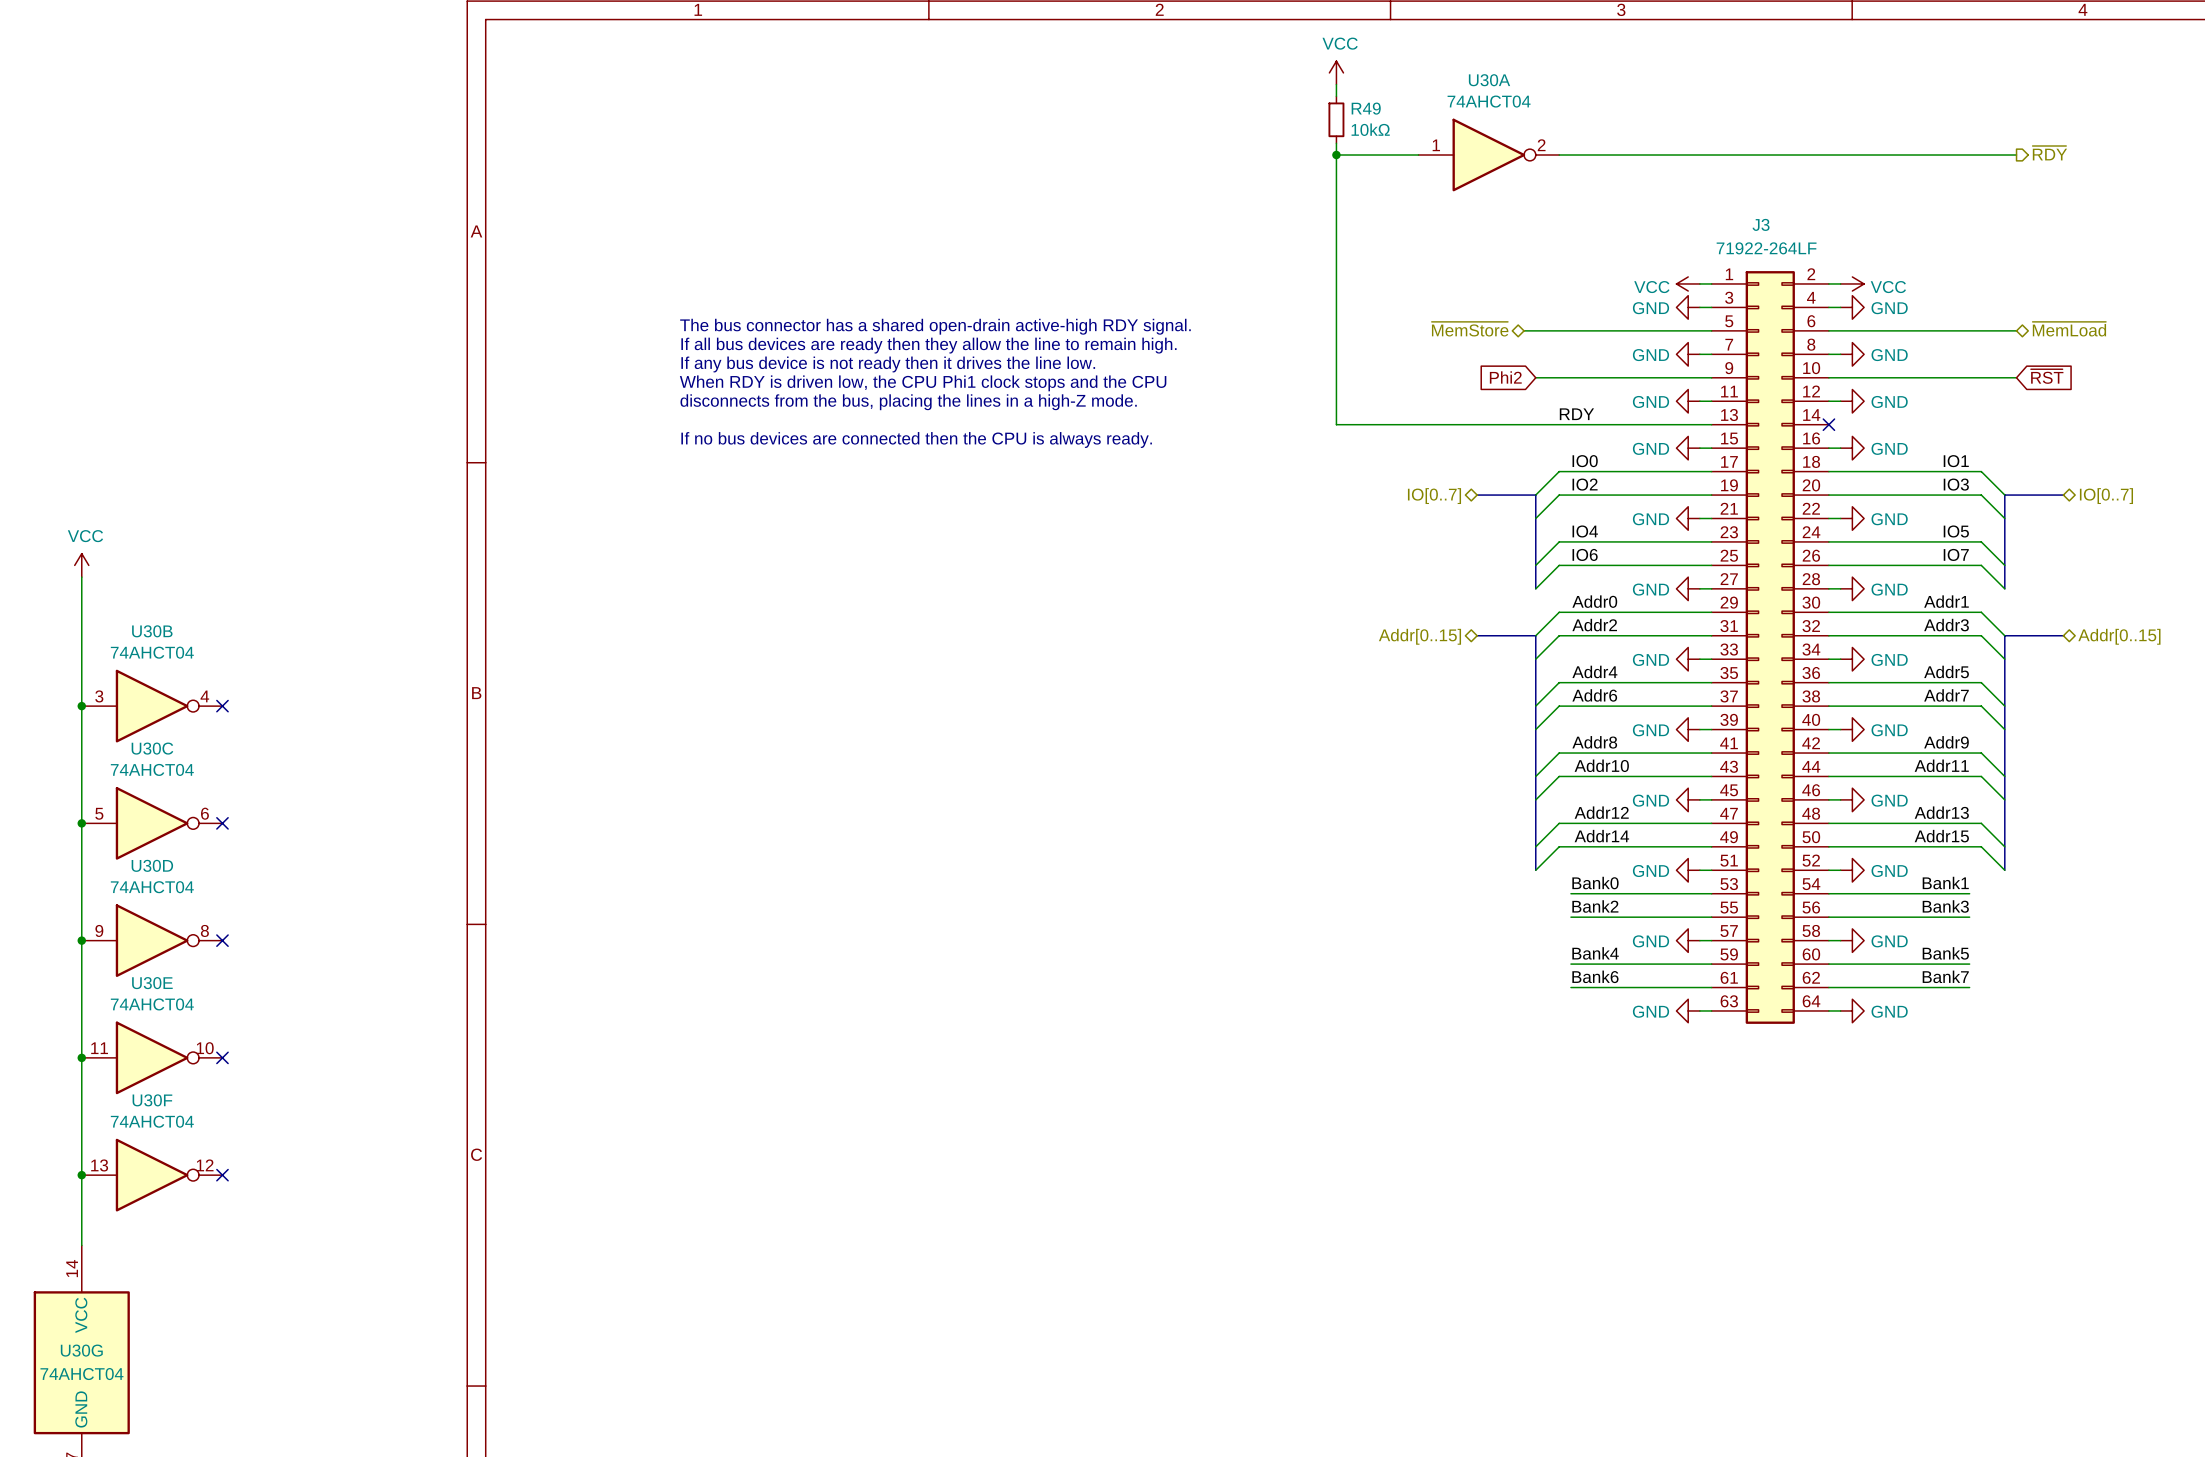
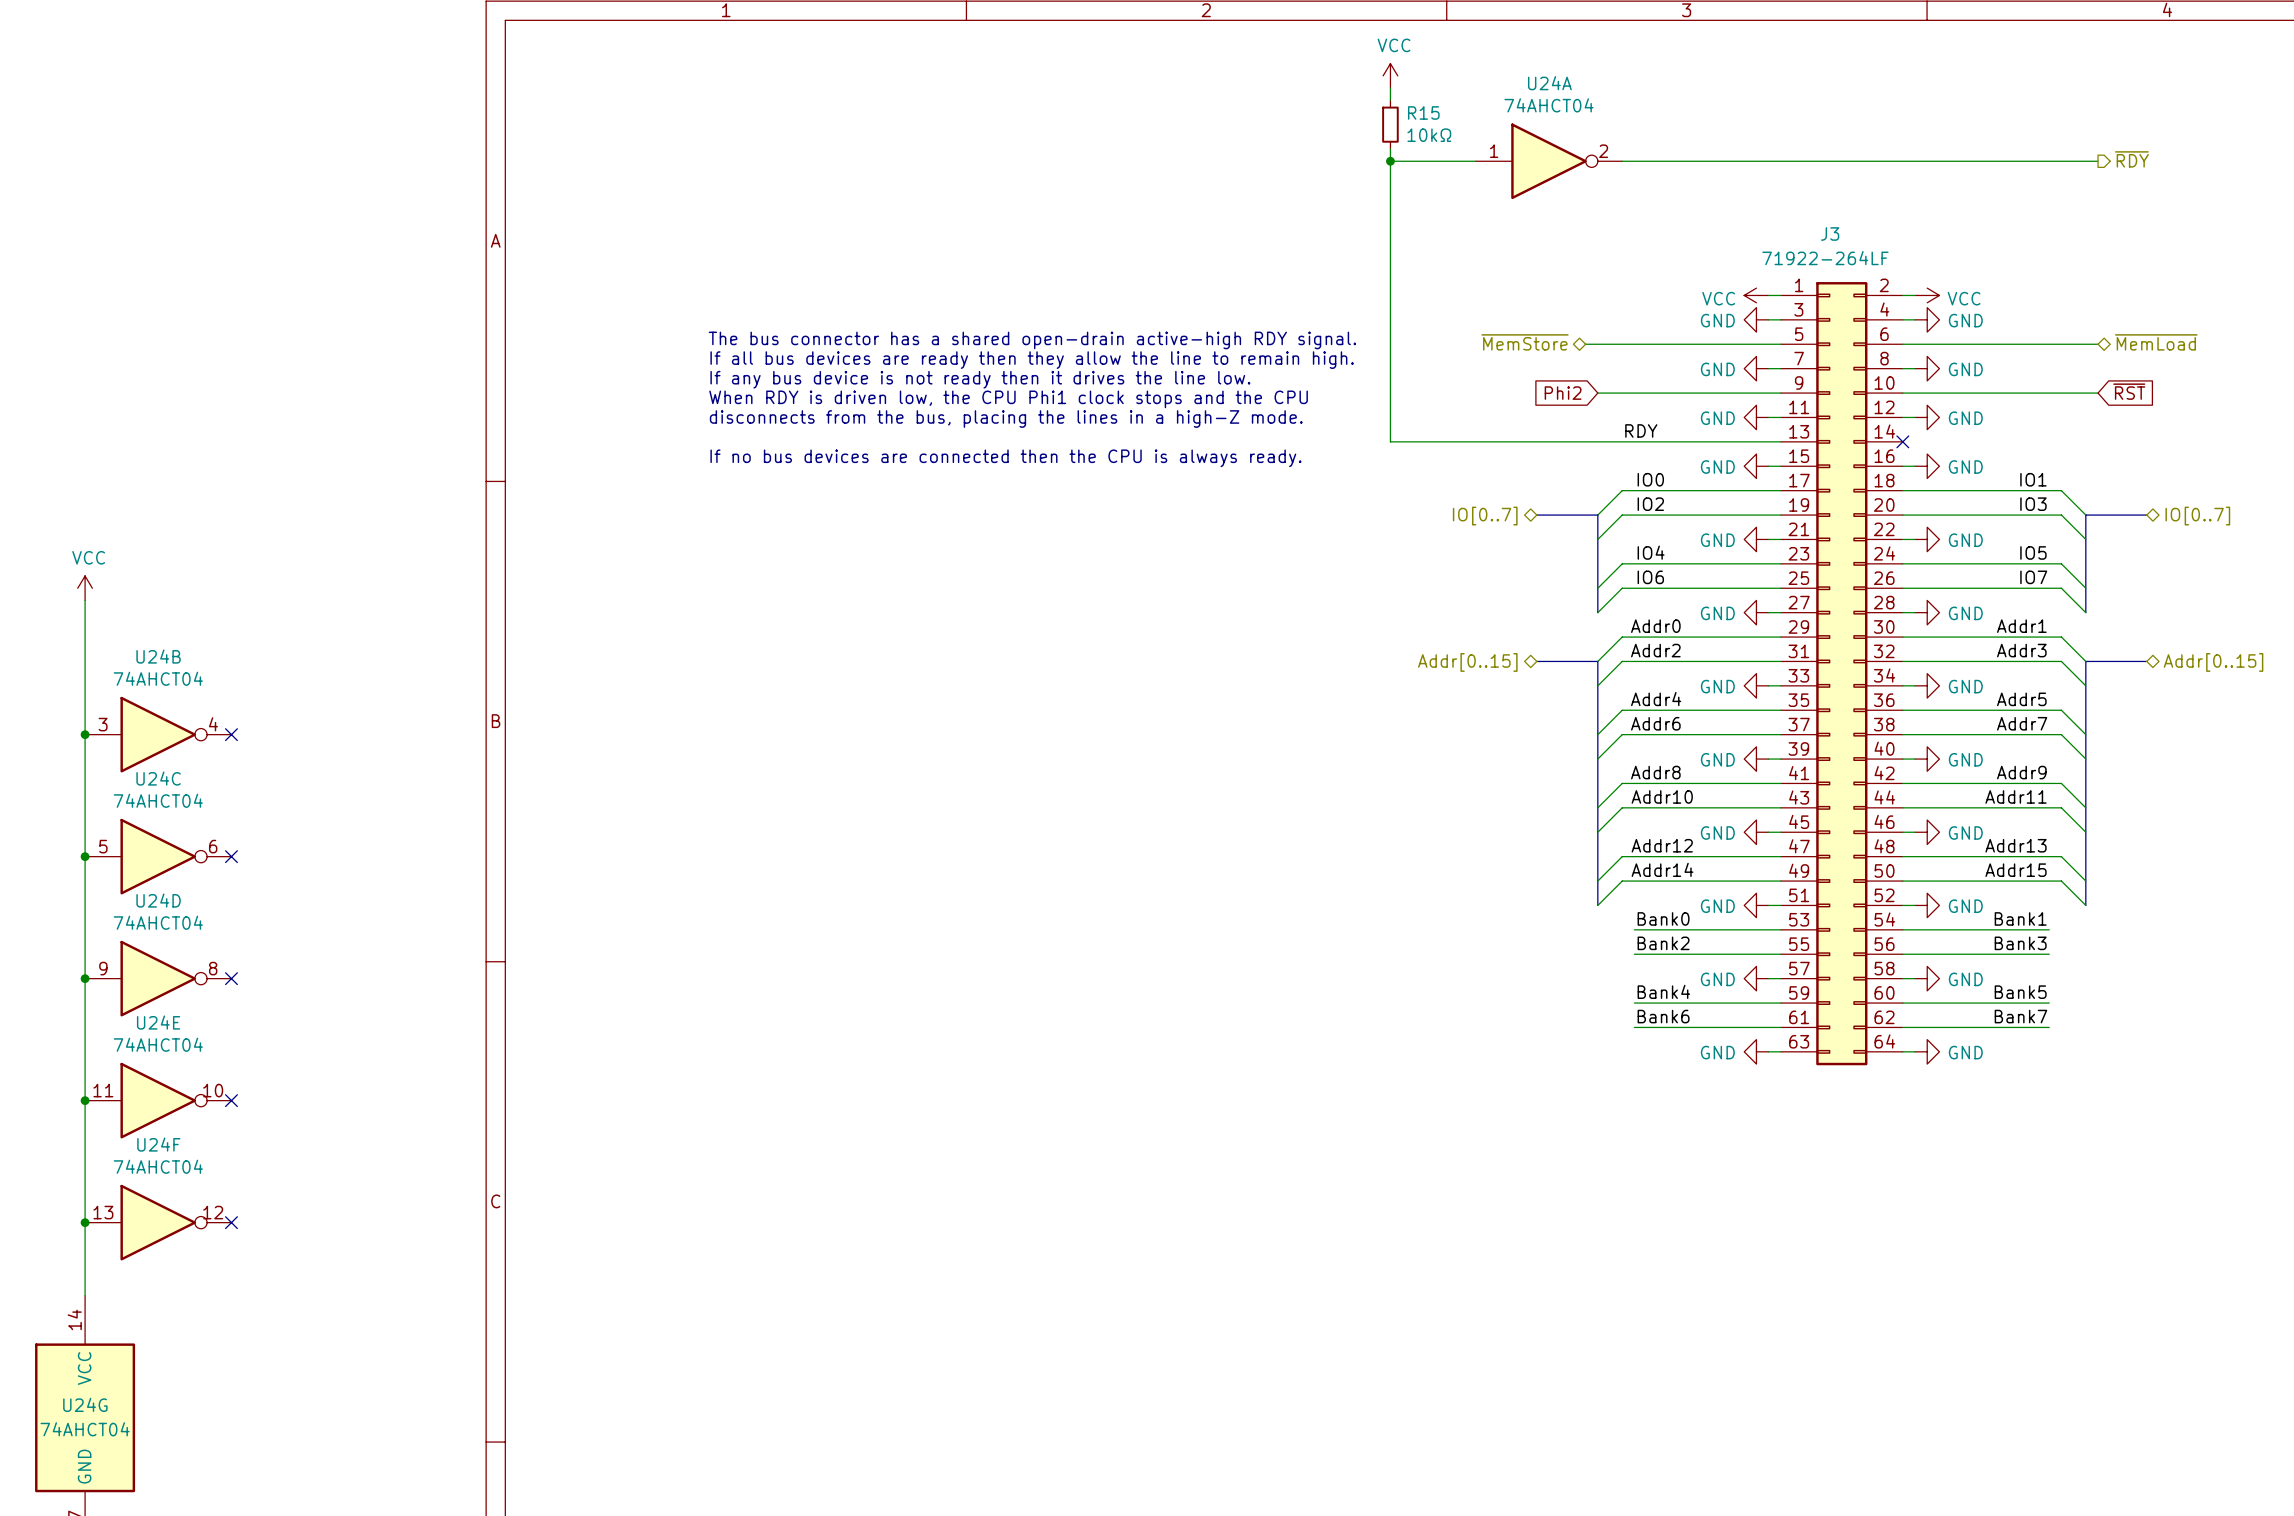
U30A name: U30A (1489, 80) -> U24A (1549, 83)
R49 name: R49 (1366, 108) -> R15 (1423, 112)
U30B name: U30B (152, 631) -> U24B (158, 656)
U30C name: U30C (152, 748) -> U24C (158, 778)
U30D name: U30D (152, 865) -> U24D (158, 900)
U30E name: U30E (152, 983) -> U24E (158, 1022)
U30F name: U30F (152, 1100) -> U24F (158, 1144)
U30G name: U30G (81, 1350) -> U24G (85, 1404)

